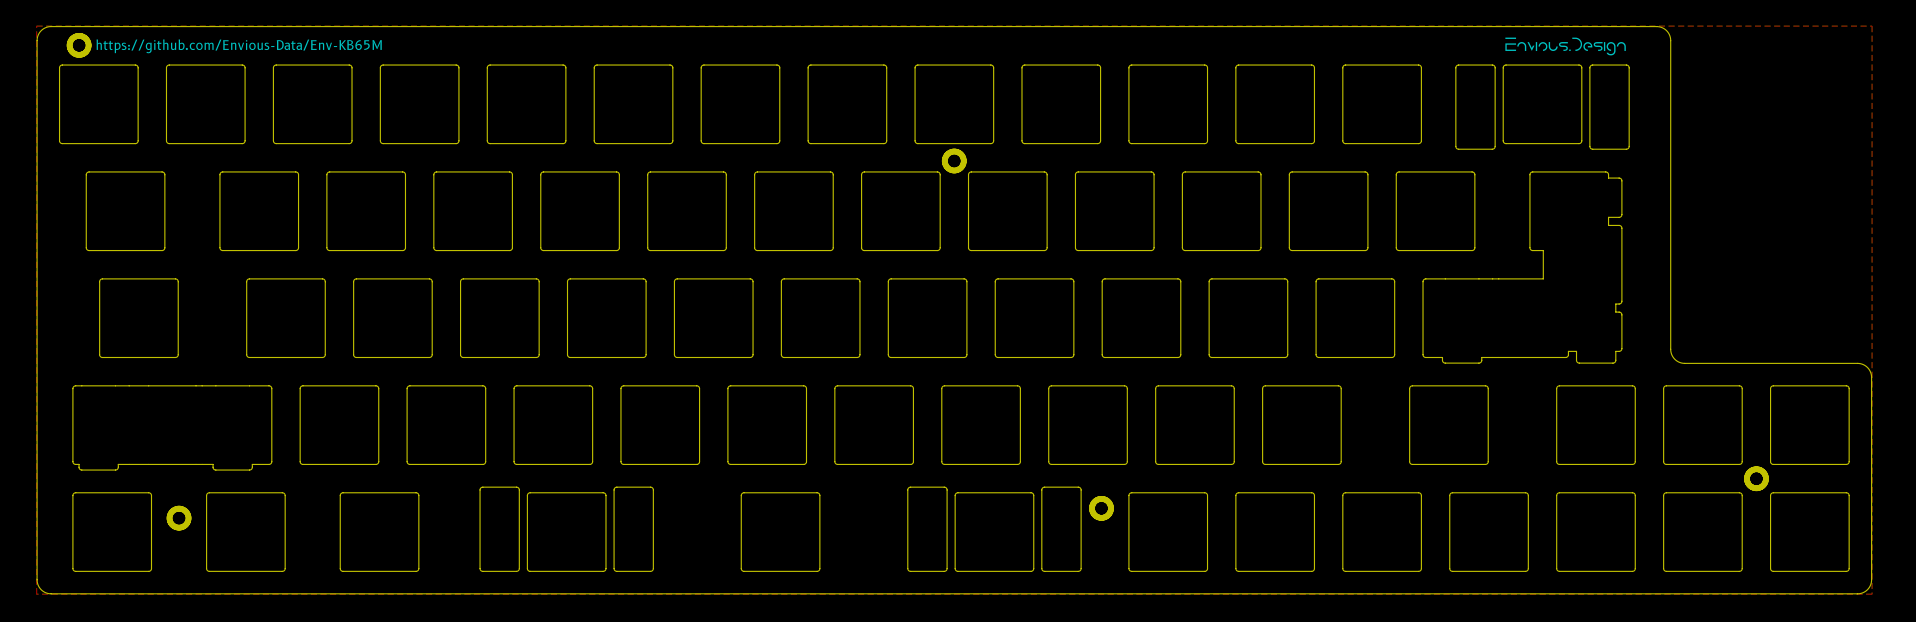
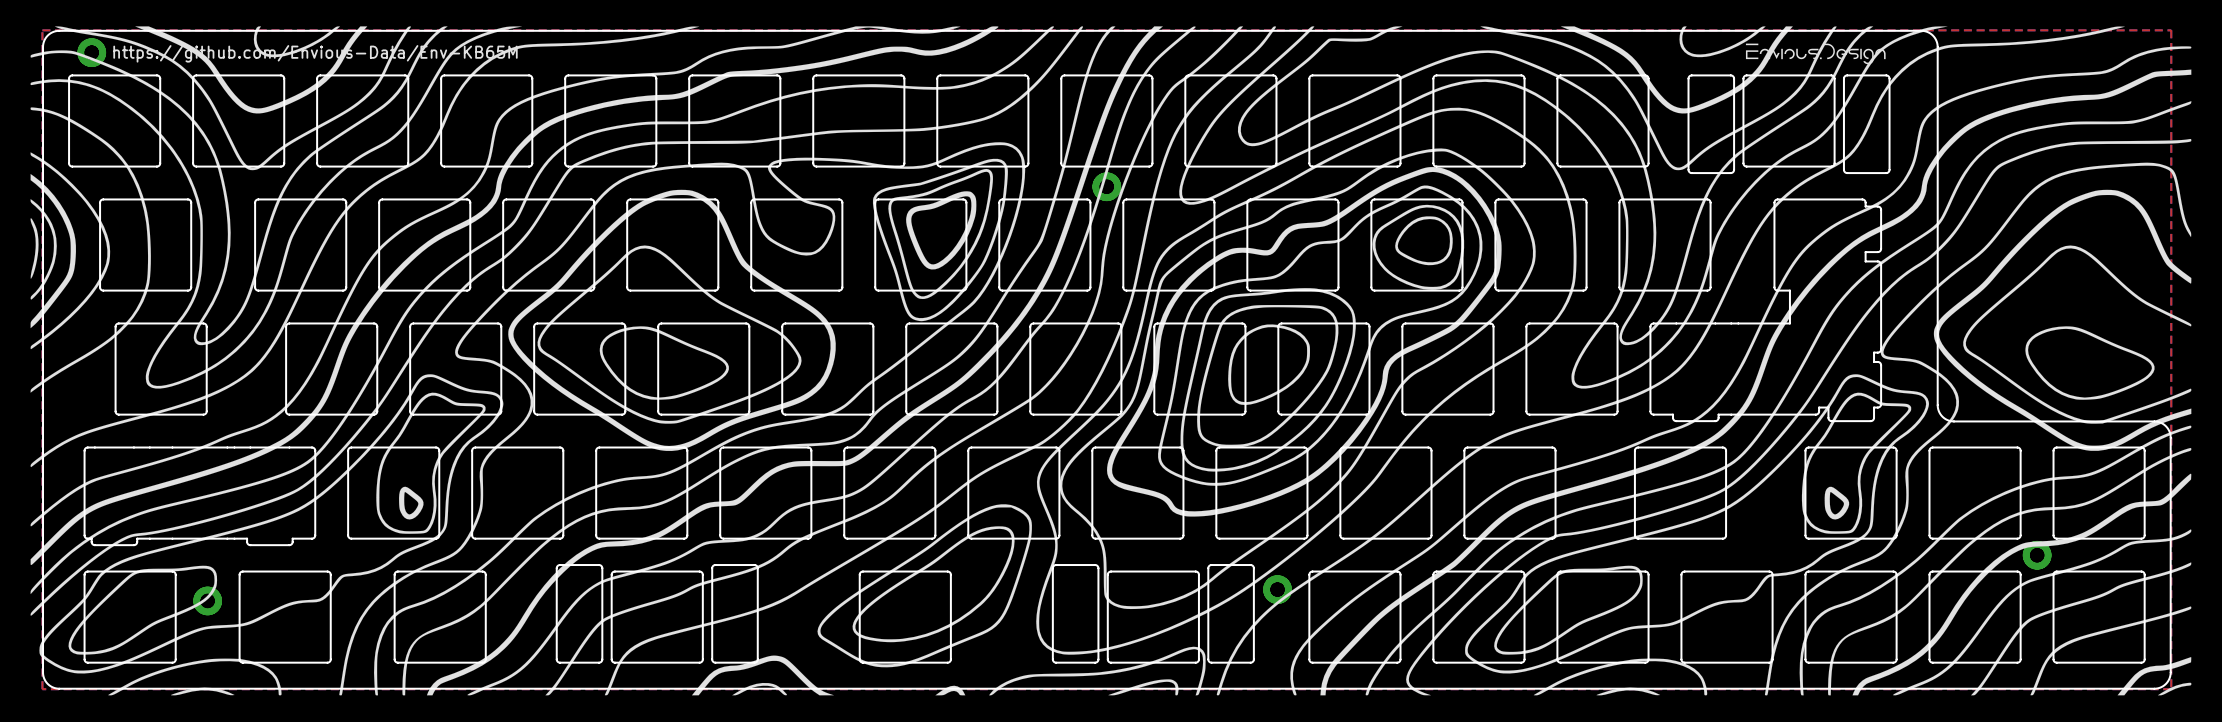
drawing: none -> [30, 26, 2192, 696]

